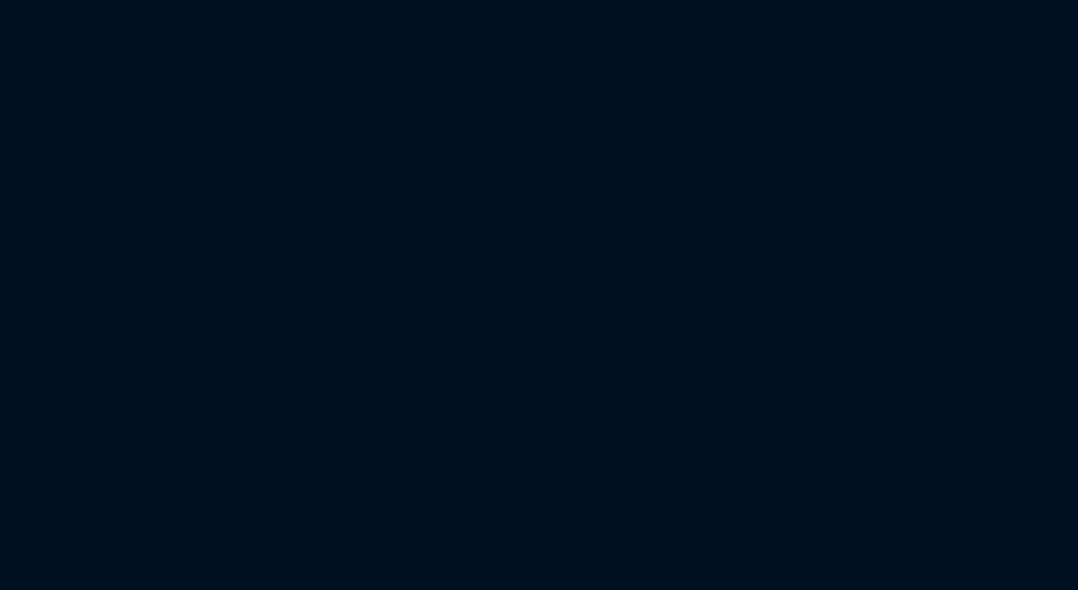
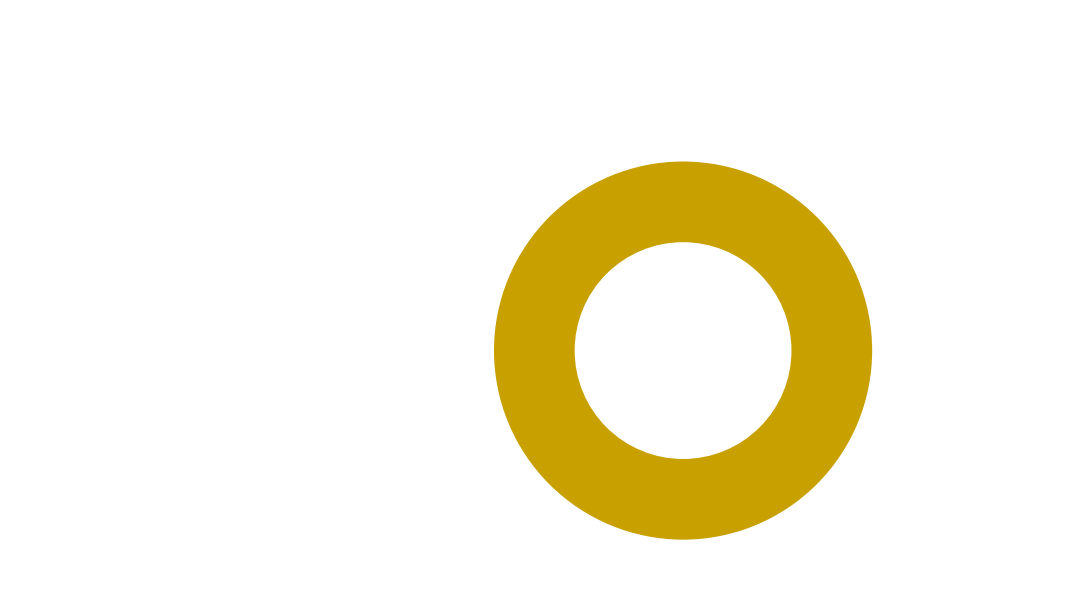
part: none -> (683, 350)

